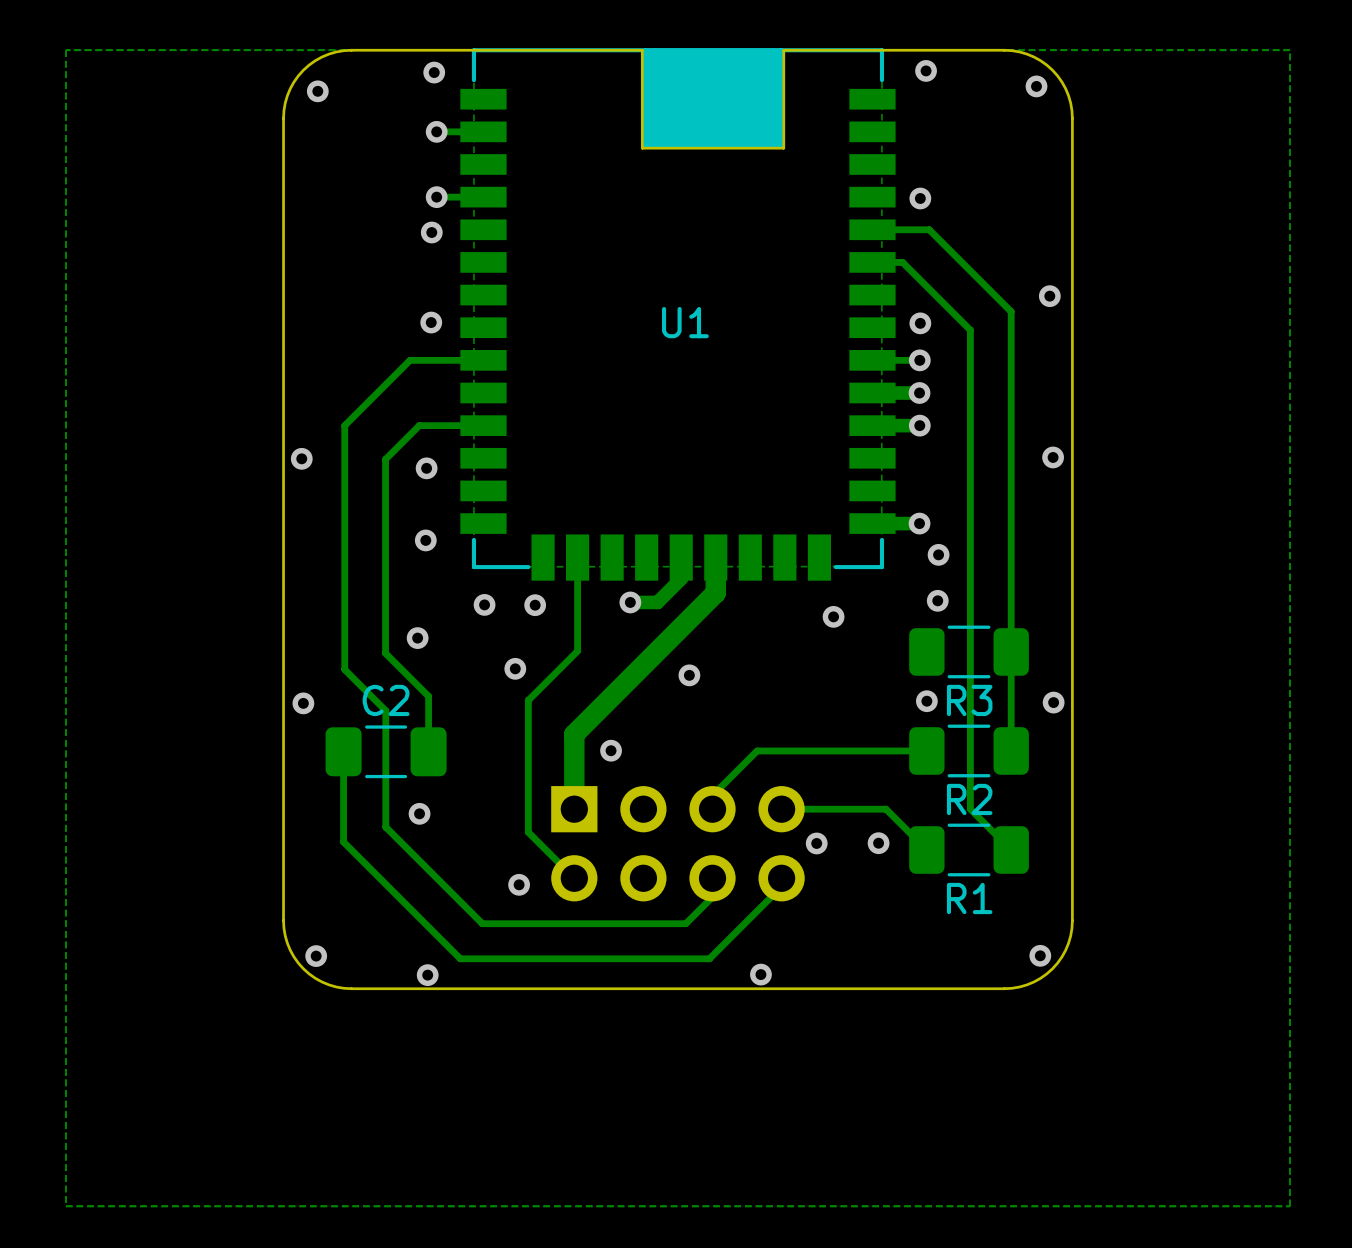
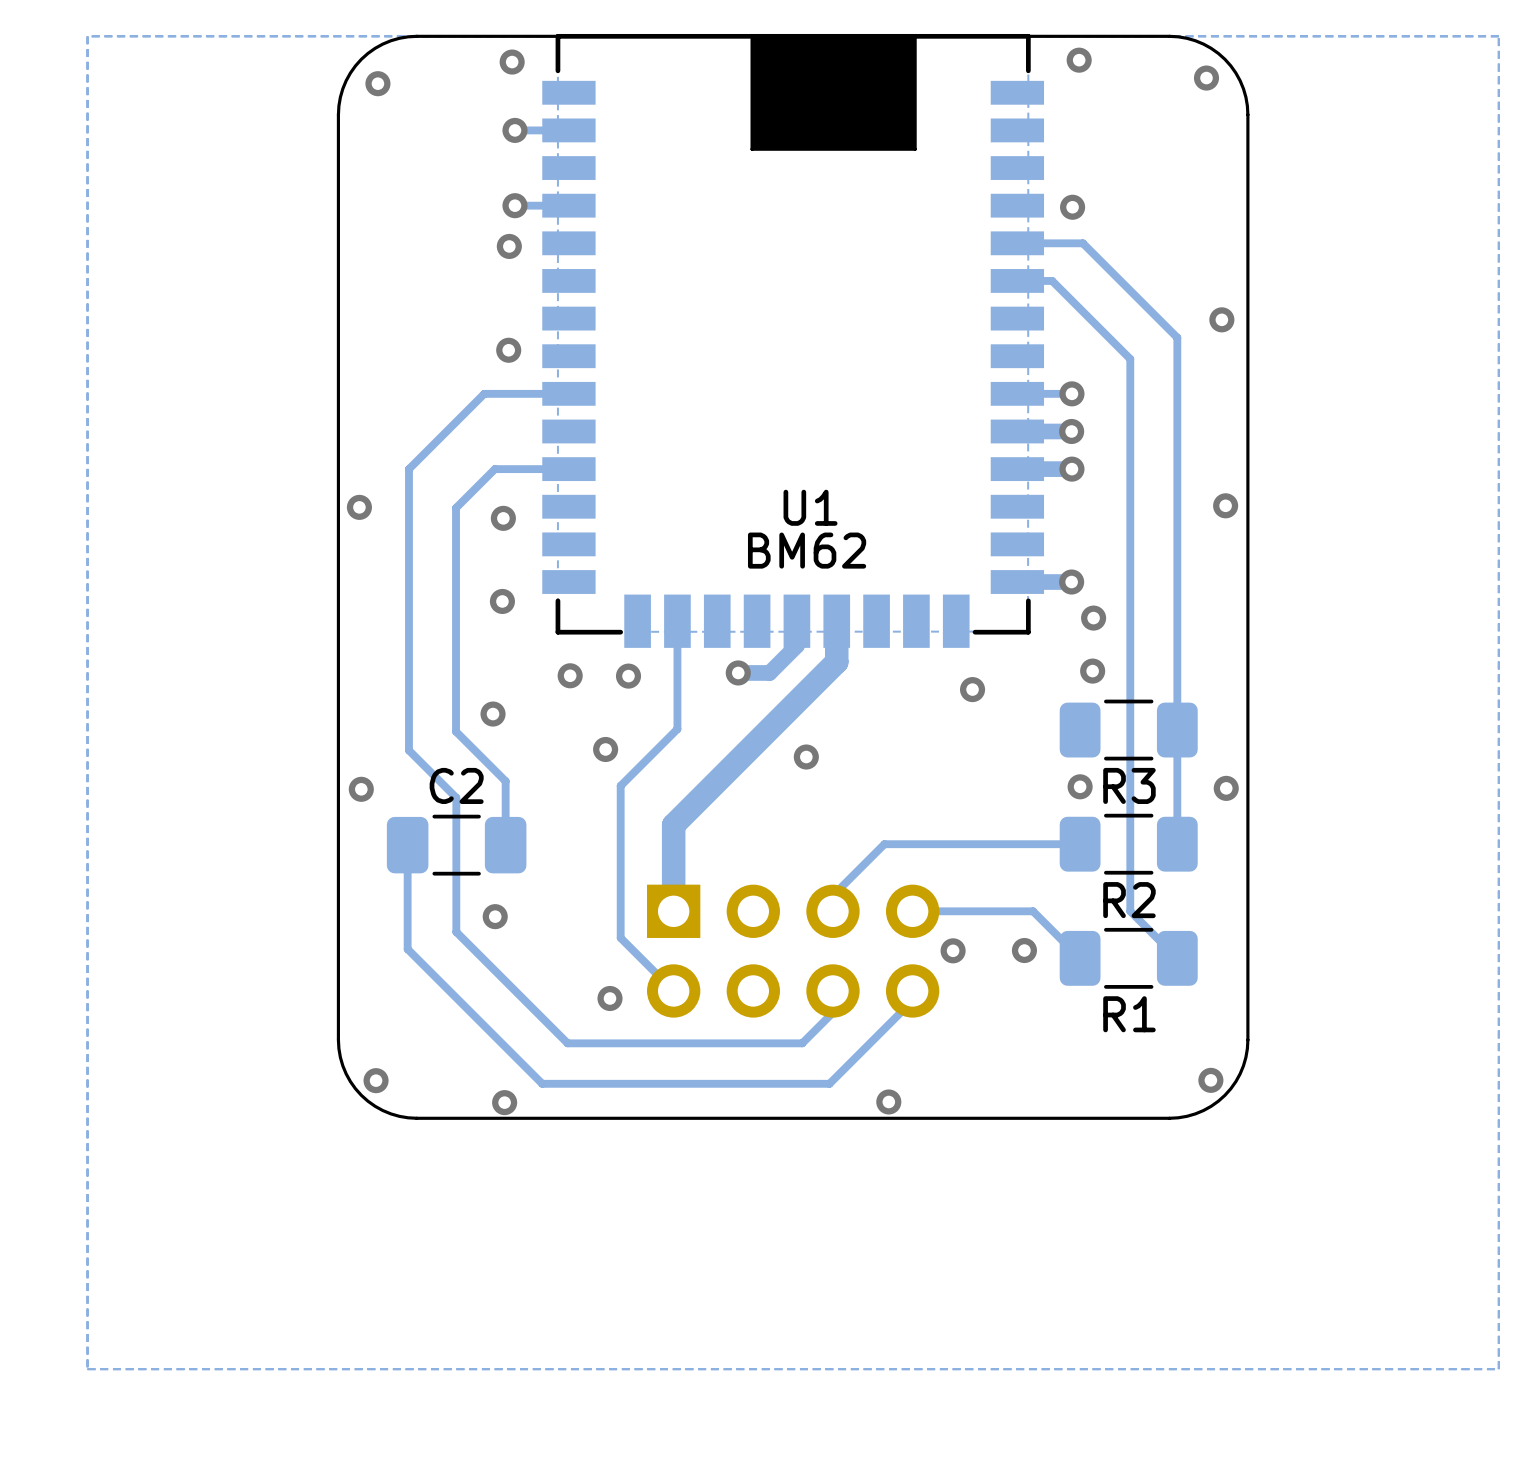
U1 name position: U1 (685, 322) -> U1 (810, 507)
via: (920, 323) -> none
U1 value: none -> BM62 (807, 550)
via: (611, 750) -> none

